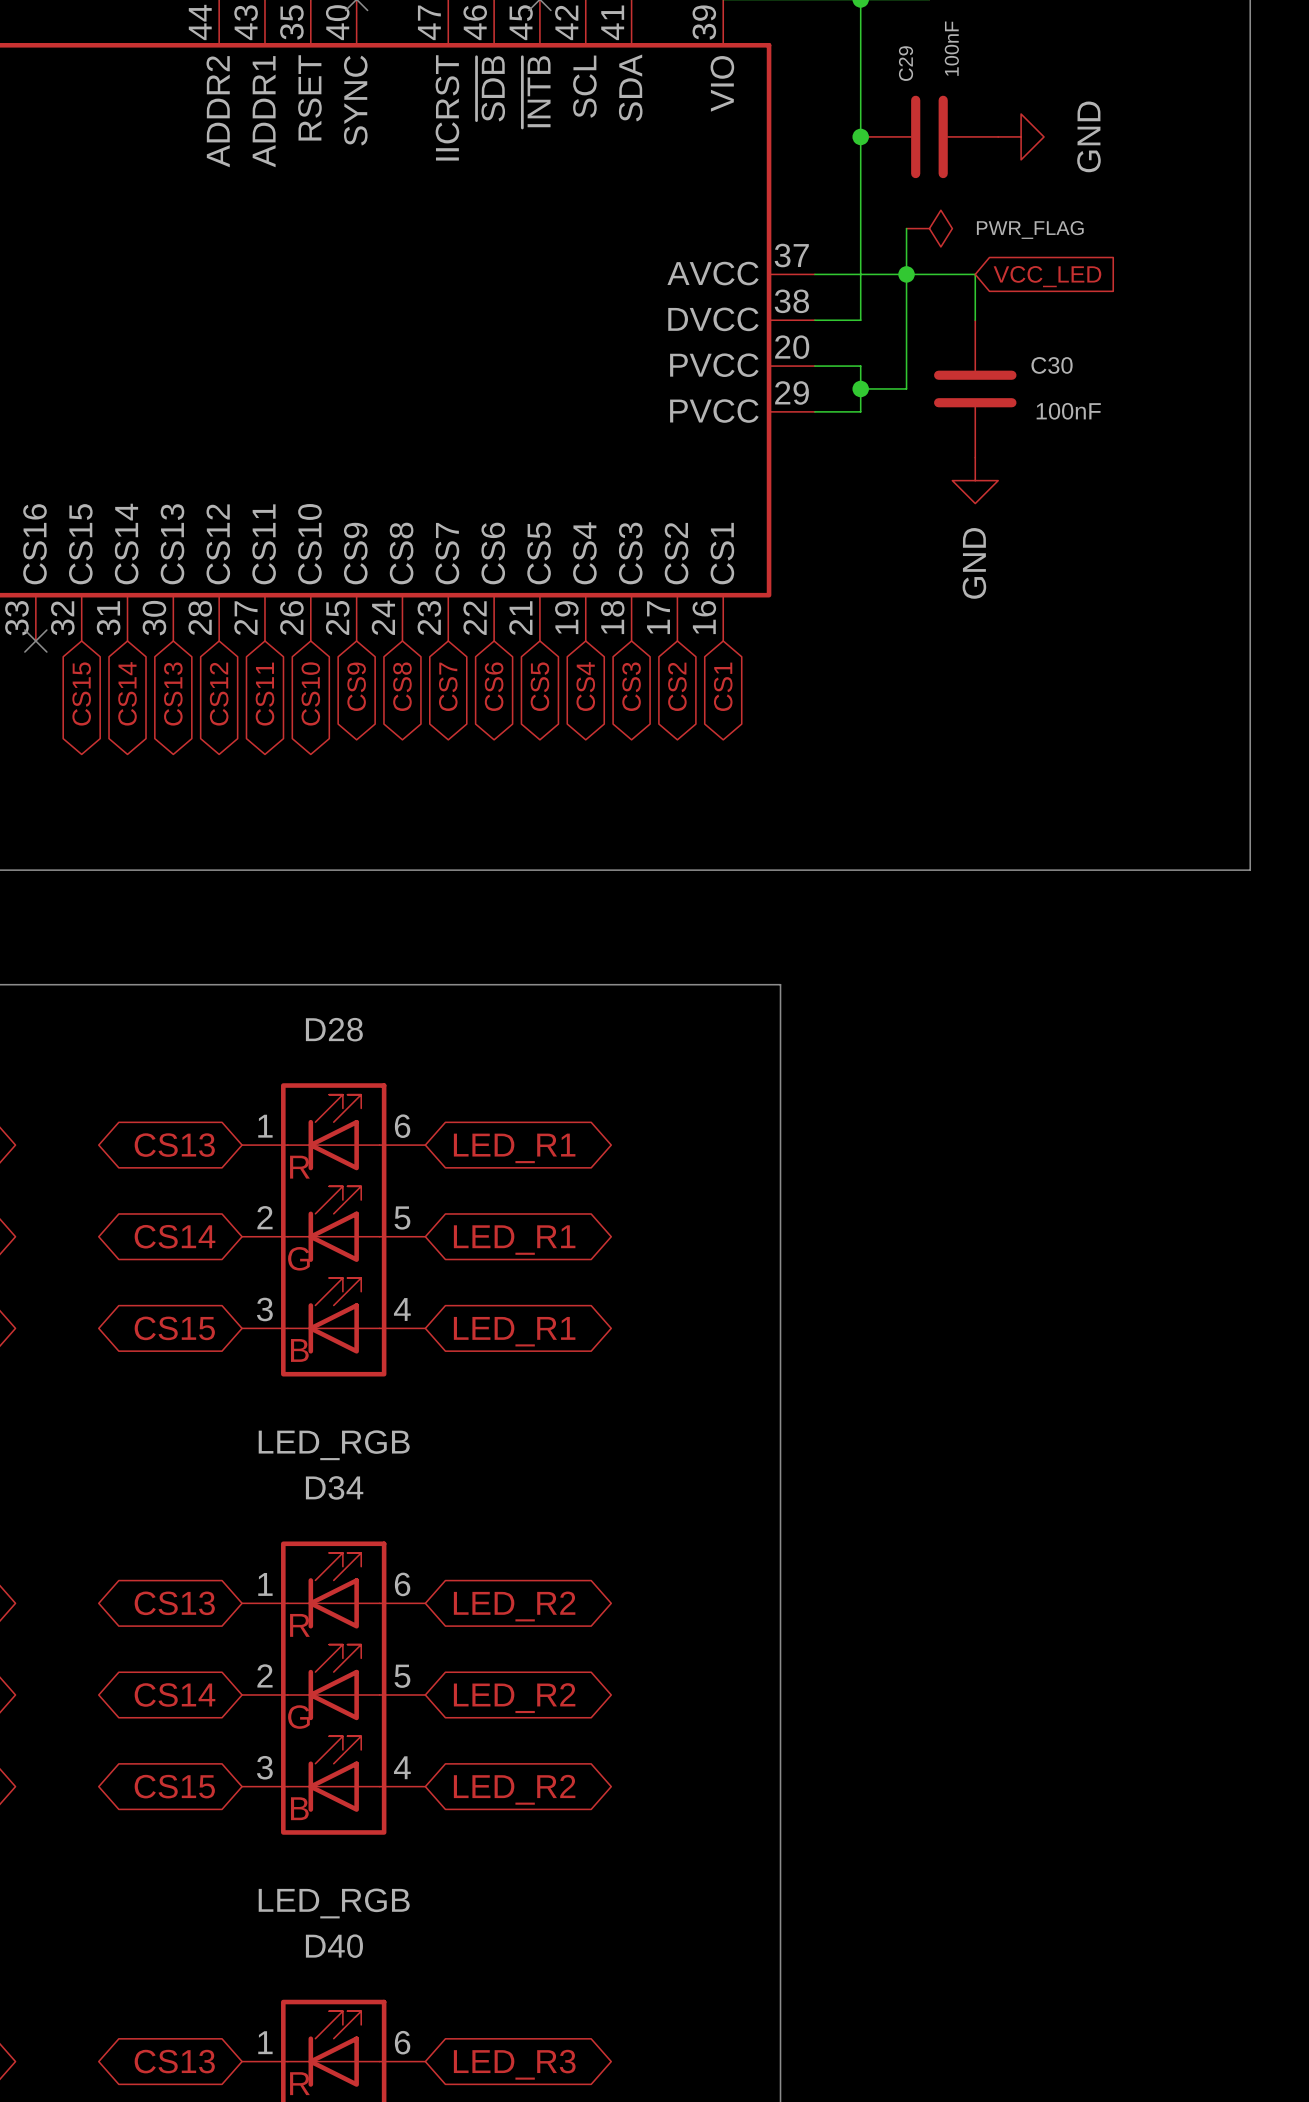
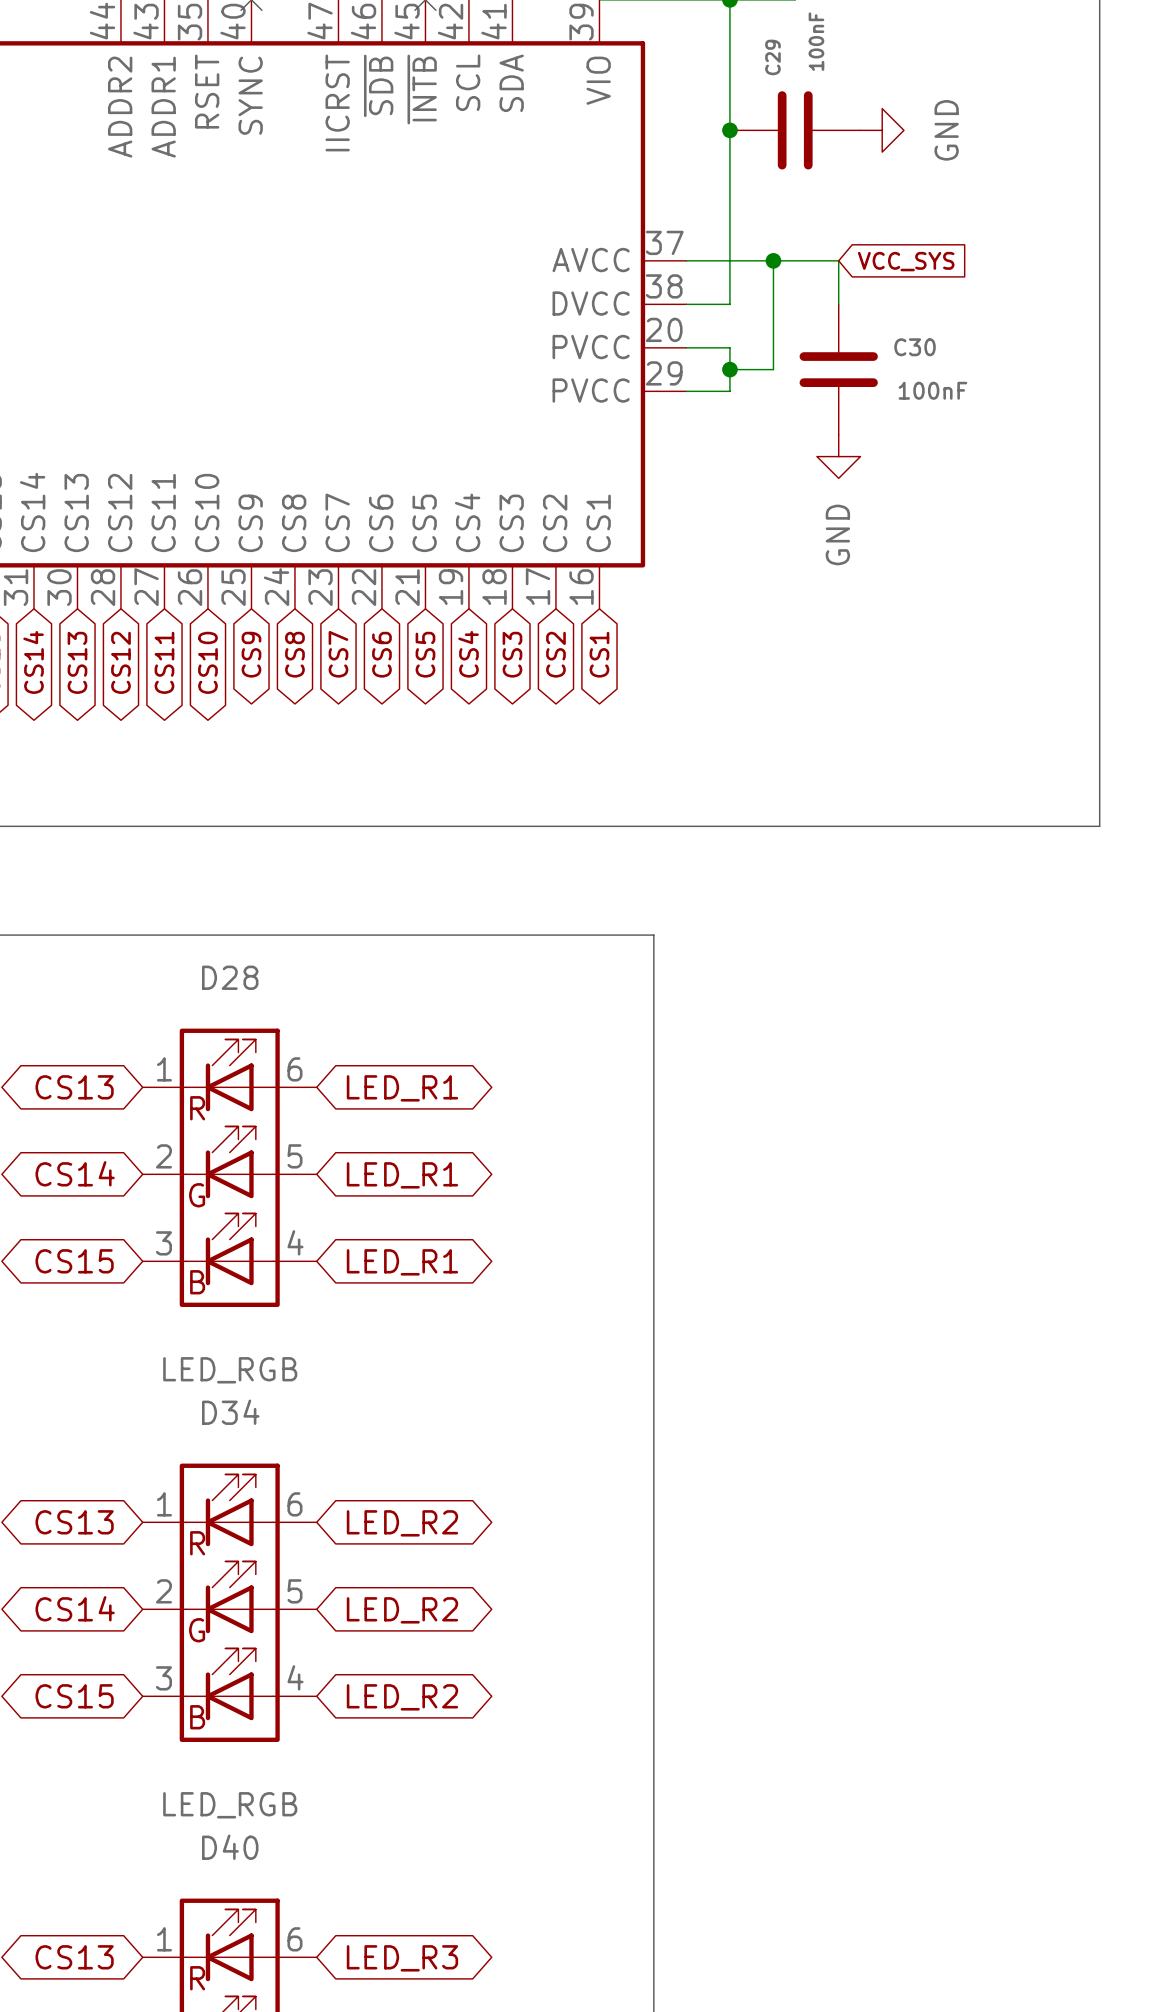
wire: (906, 228) (906, 274) -> none
power symbol: PWR_FLAG (929, 228) -> none
global label: VCC_LED (1047, 276) -> VCC_SYS (906, 261)

